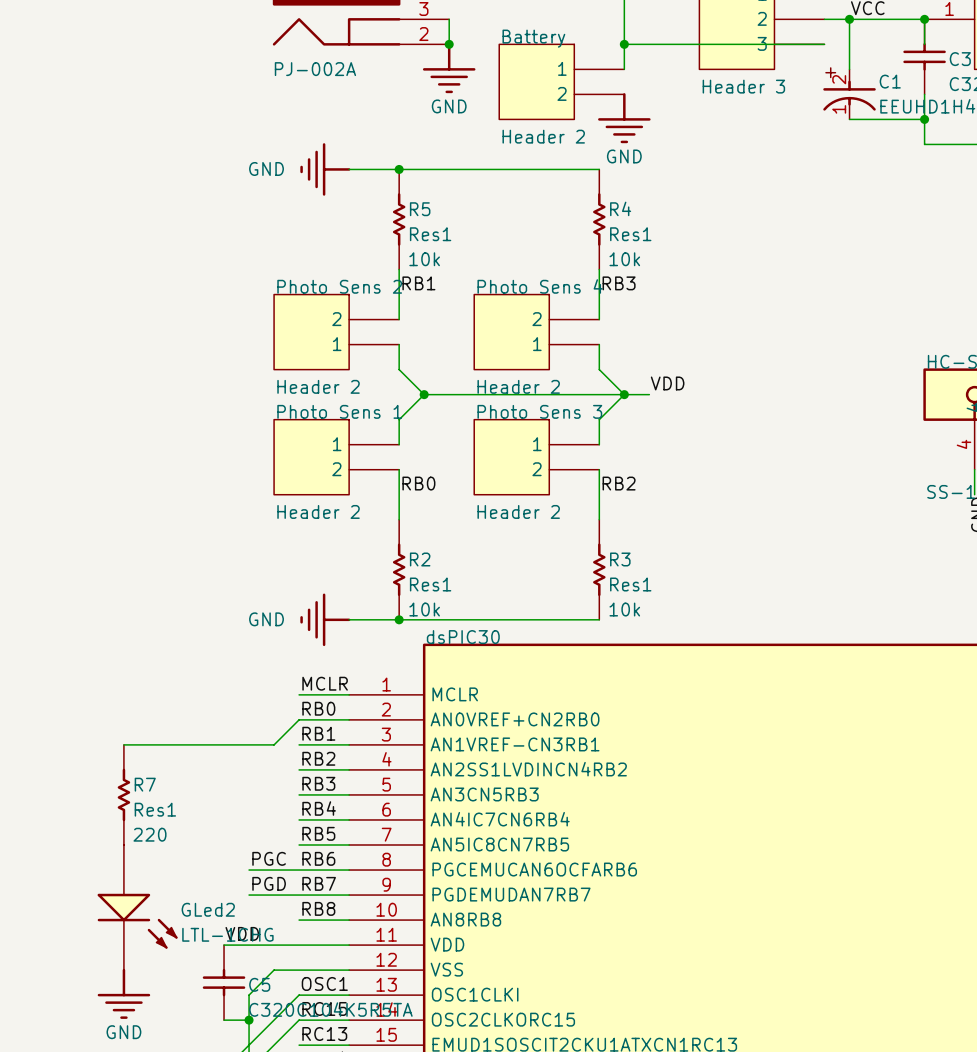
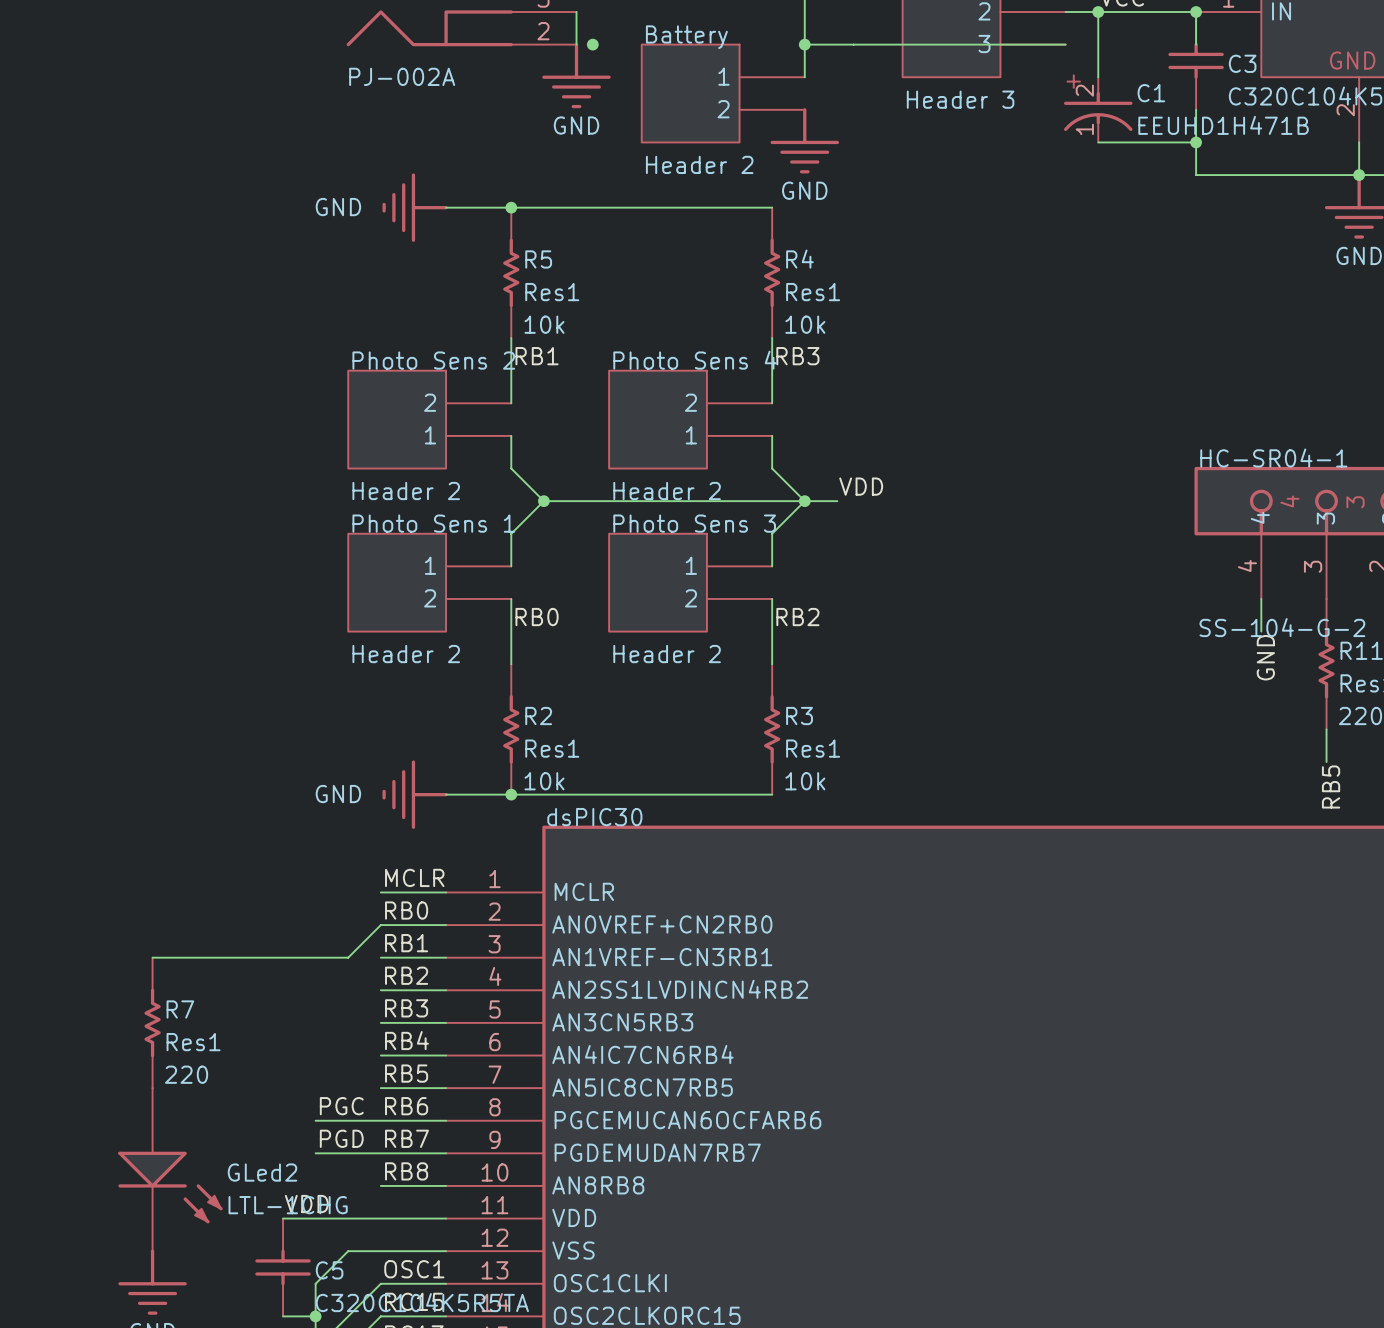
junction position: (449, 44) -> (592, 44)

